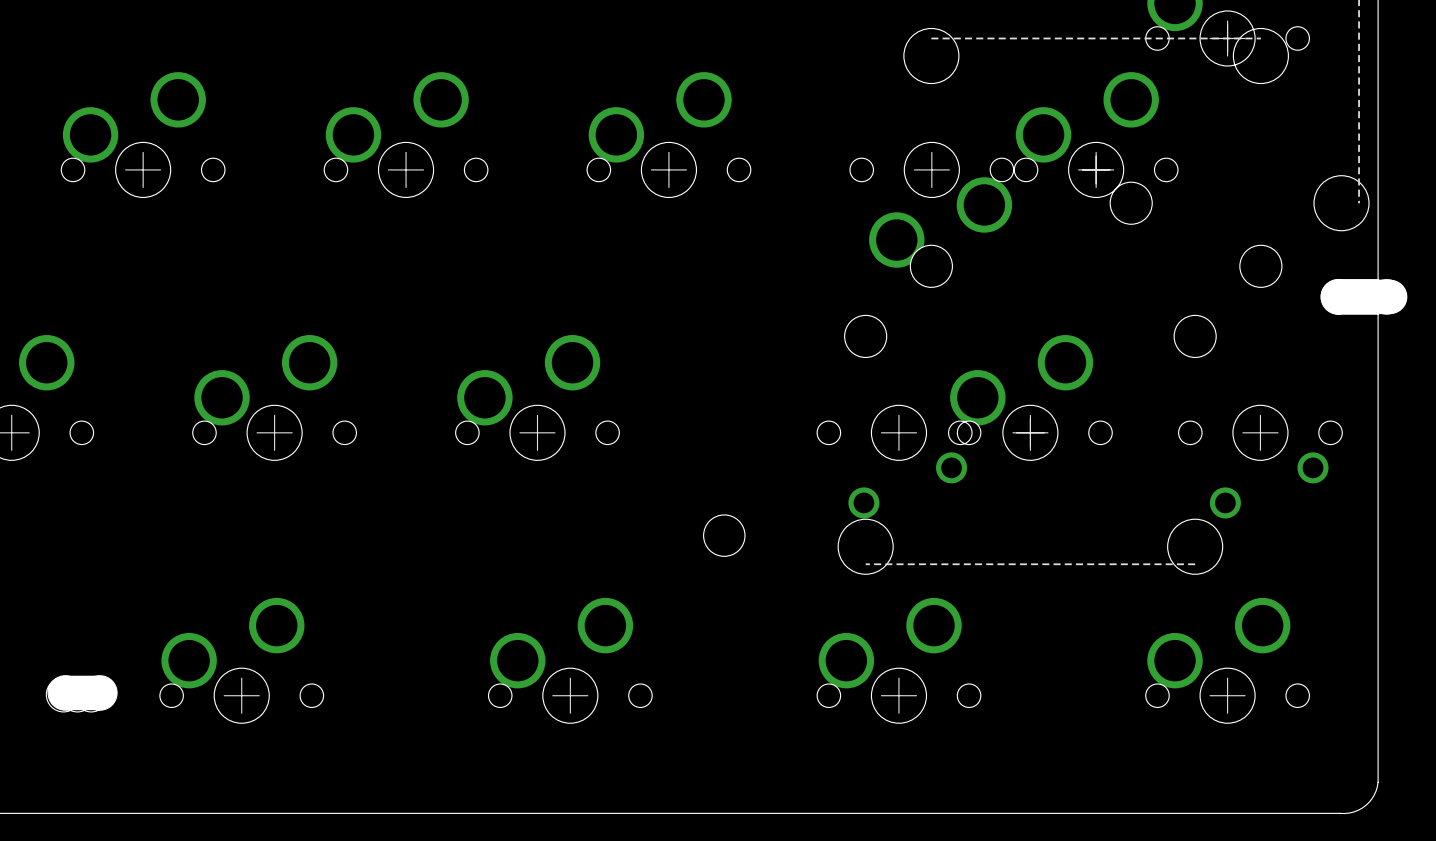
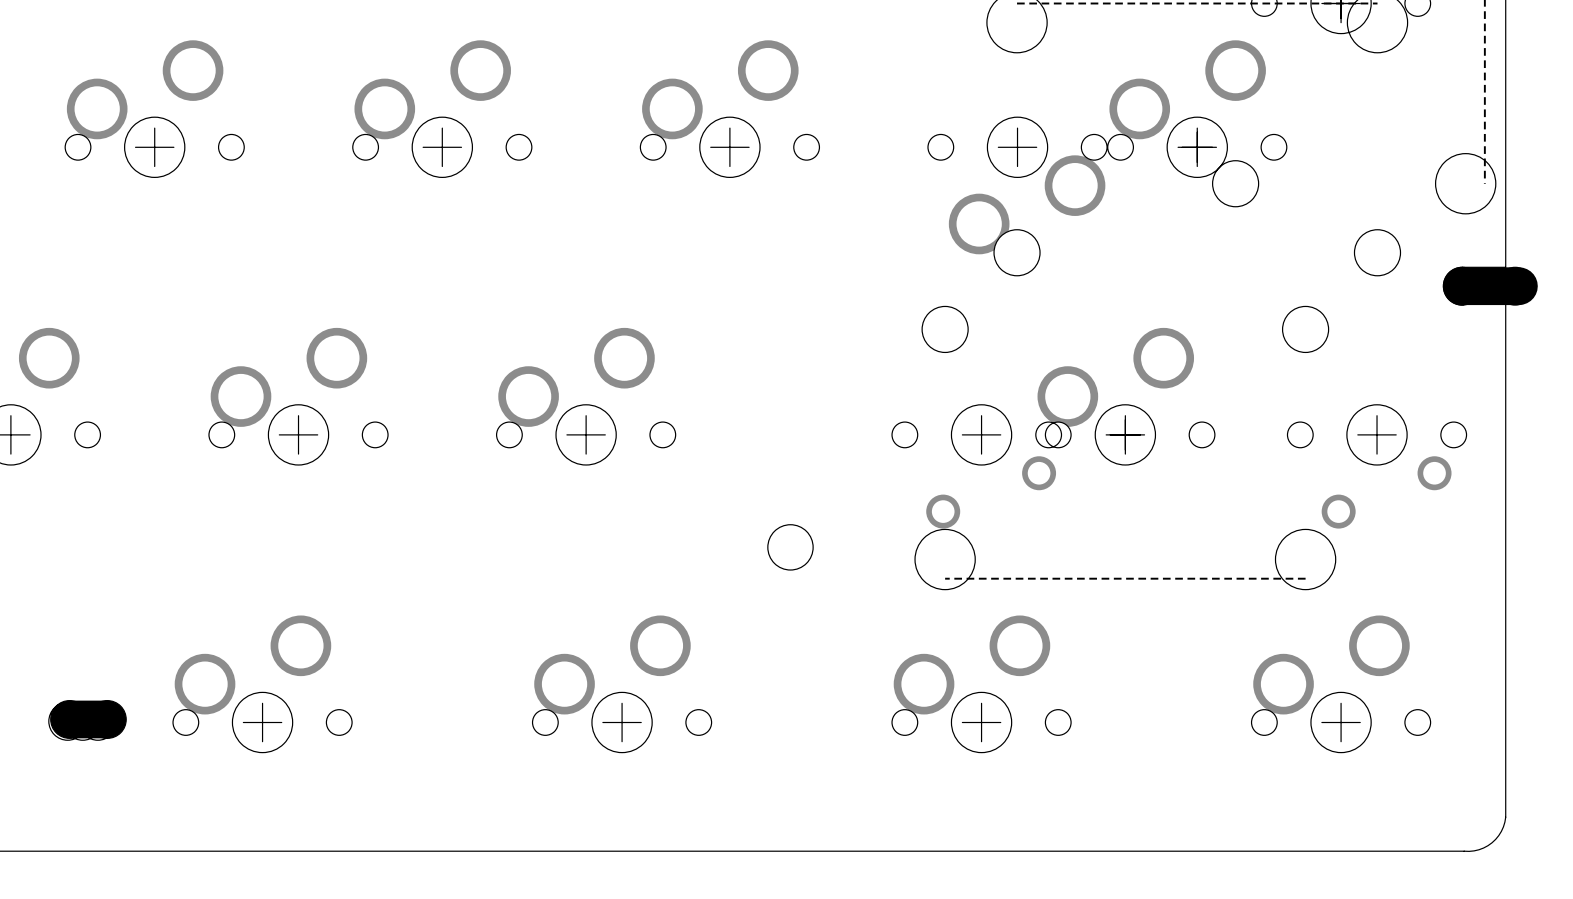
board edge: (1337, 314) (1378, 314) -> none

